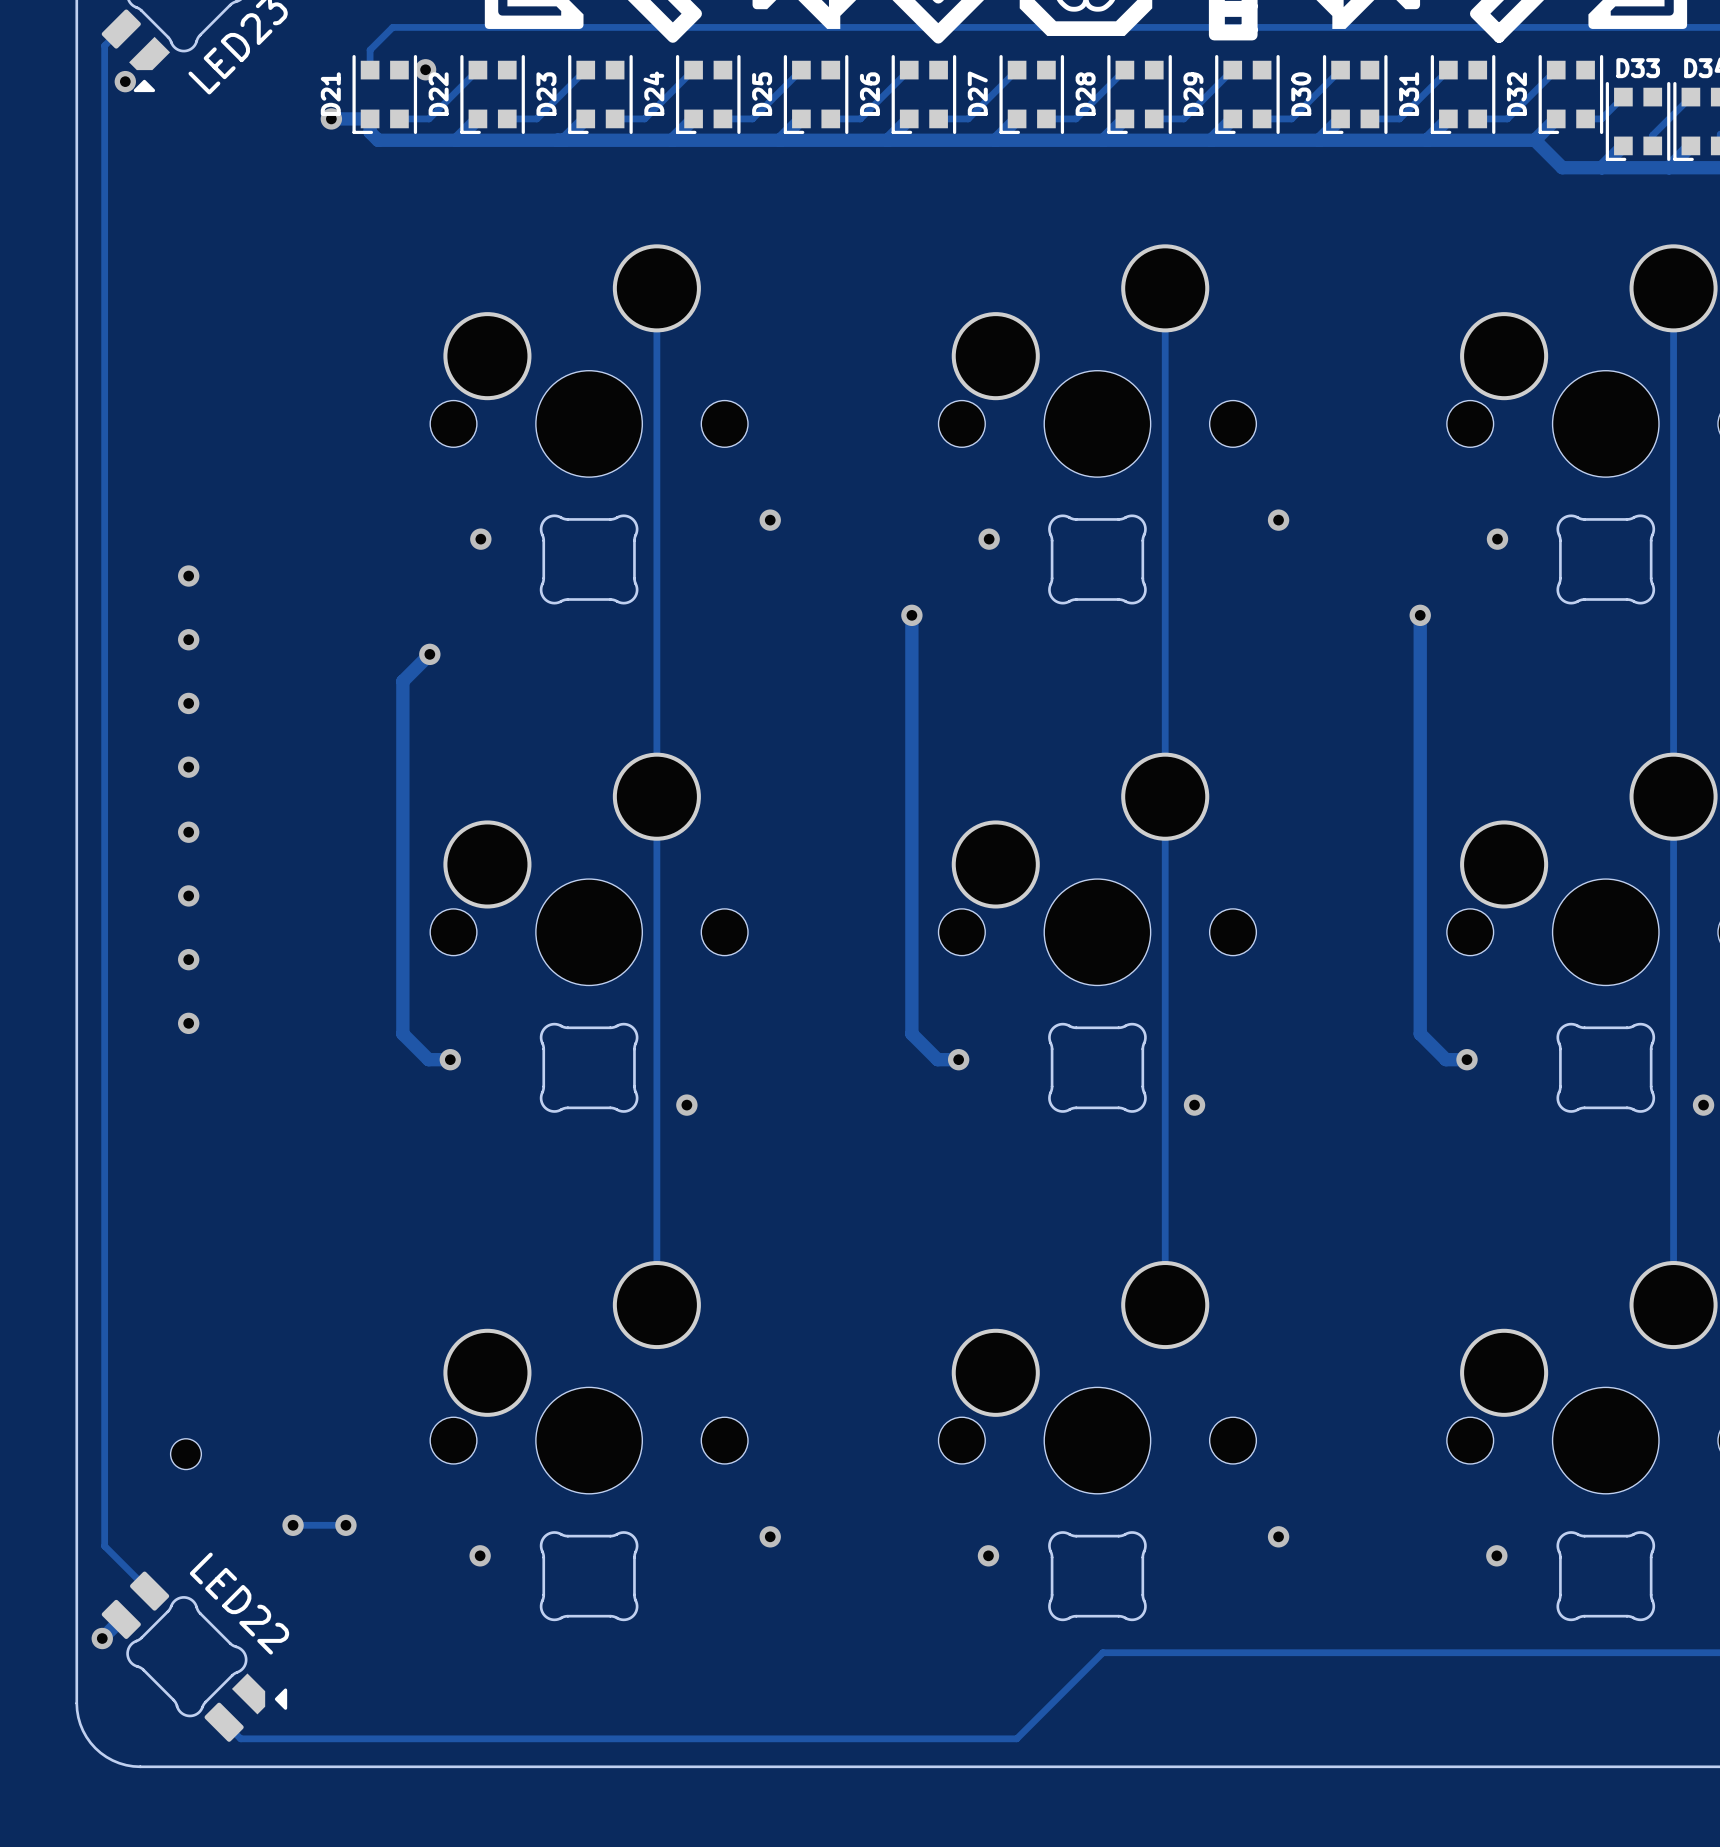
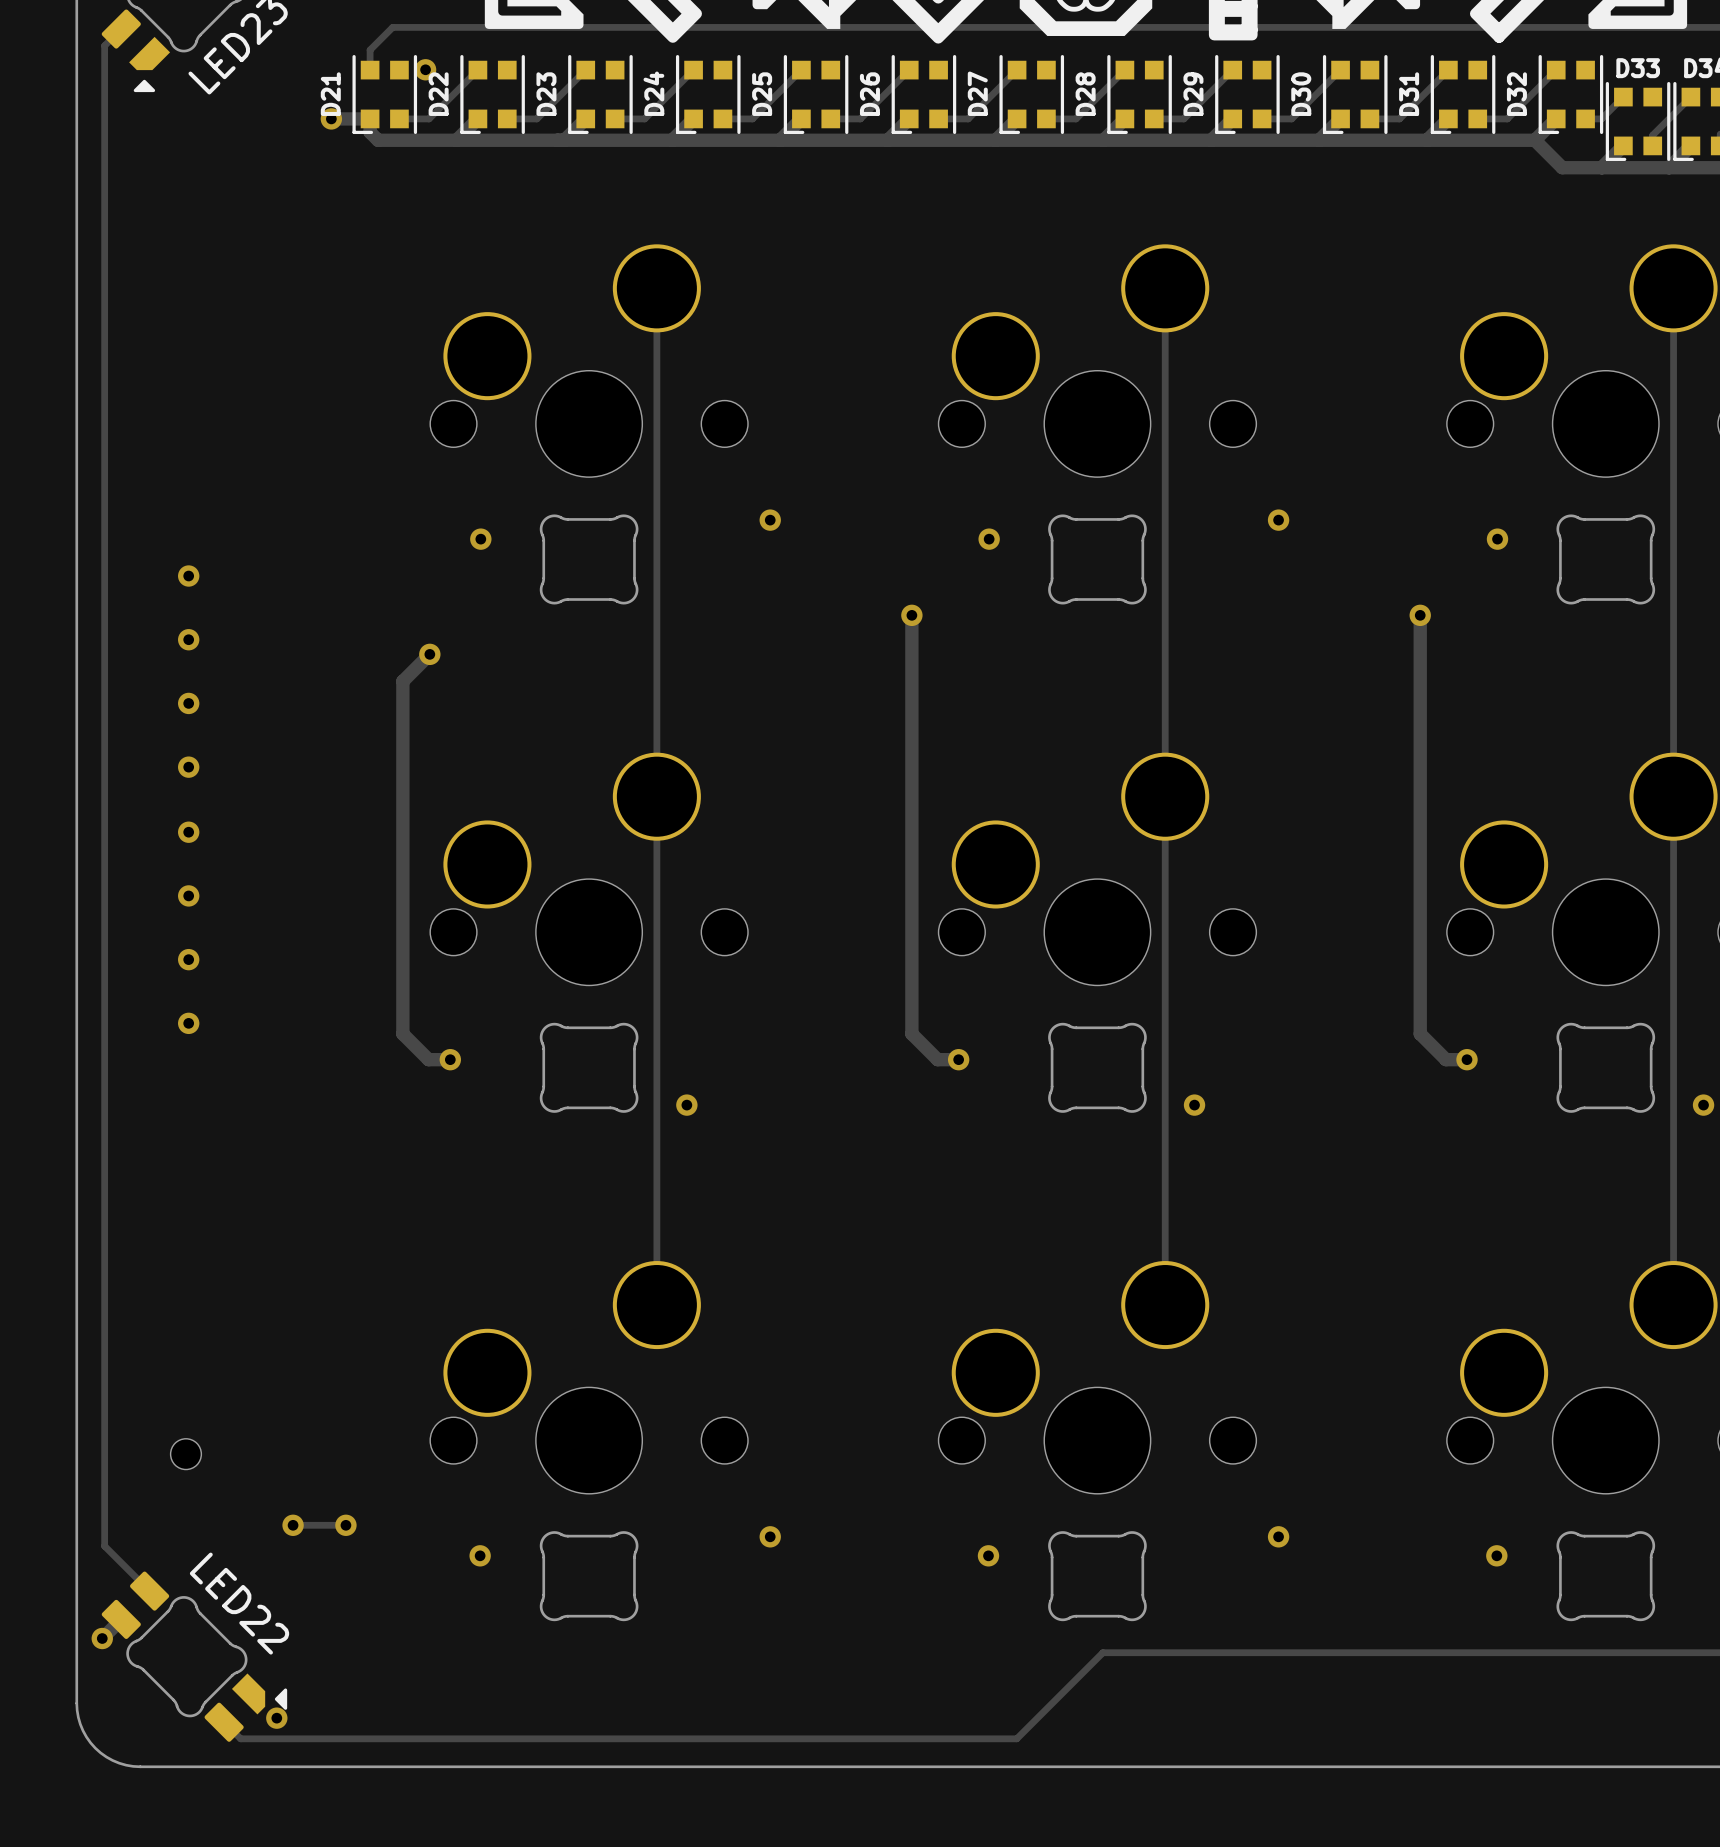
via: (125, 81) -> none
via: none -> (276, 1718)

